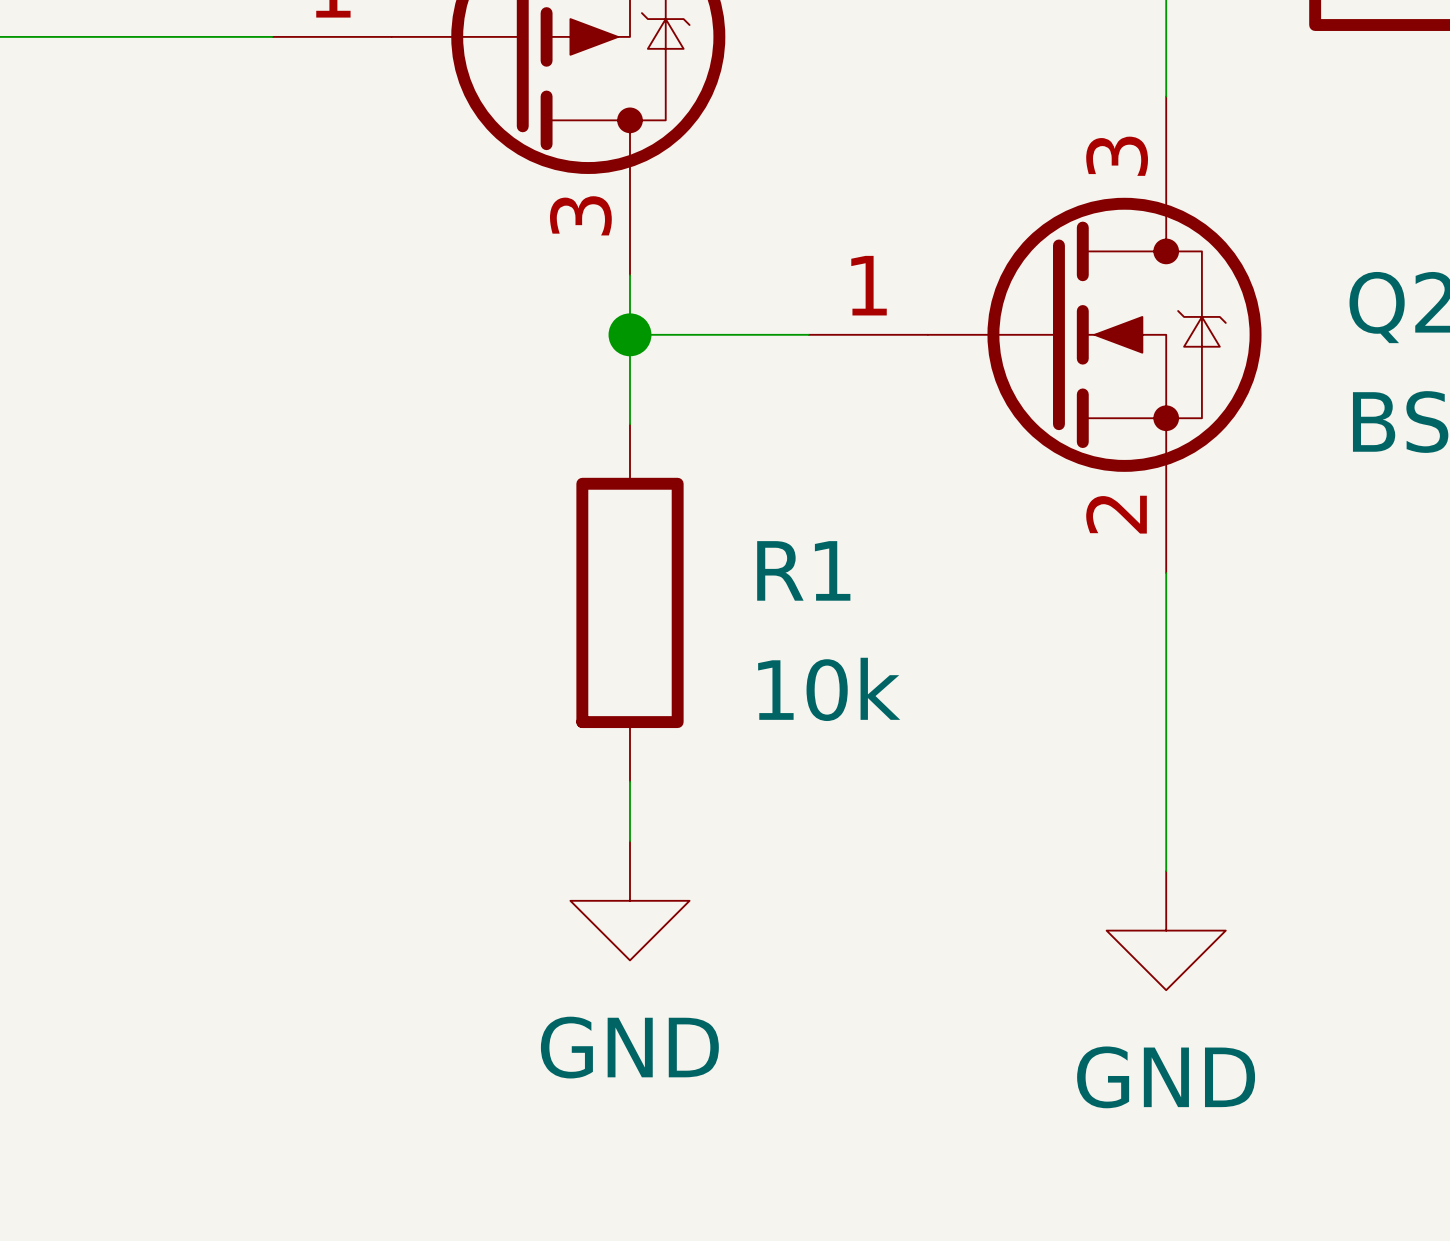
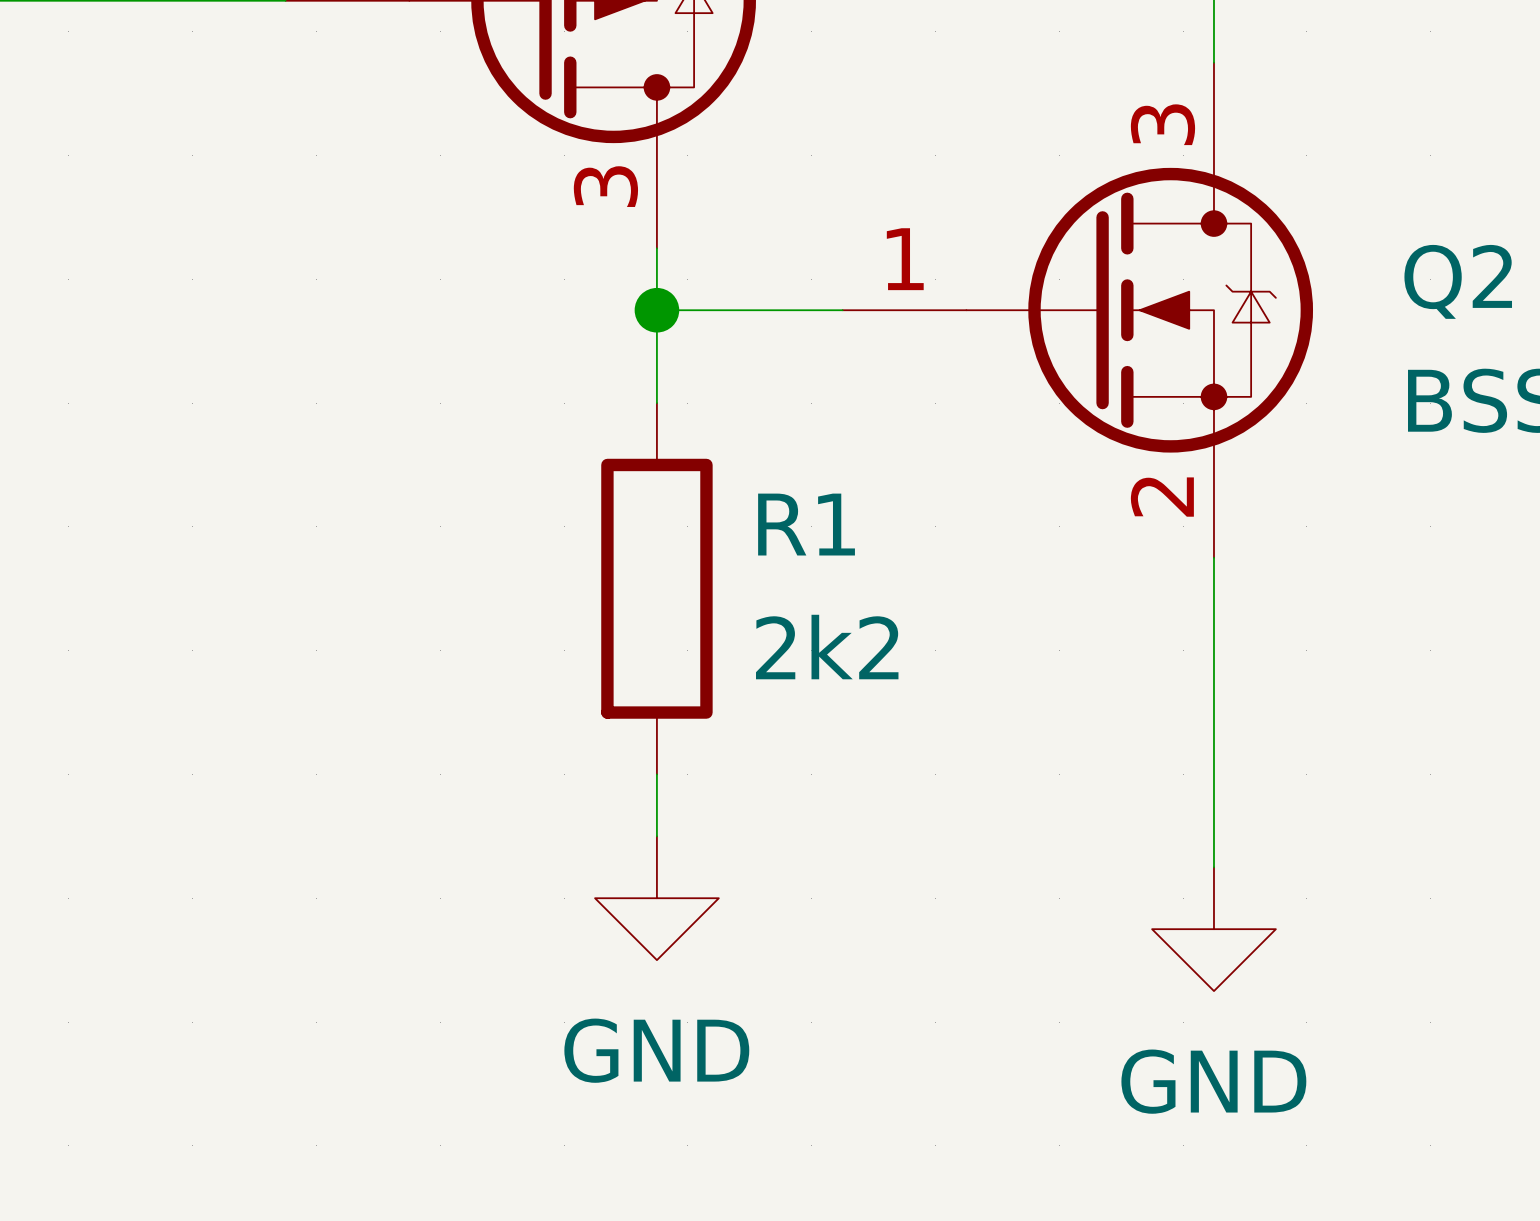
R1 name position: R1 (803, 570) -> R1 (806, 524)
R1 value: 10k (829, 689) -> 2k2 (827, 647)

